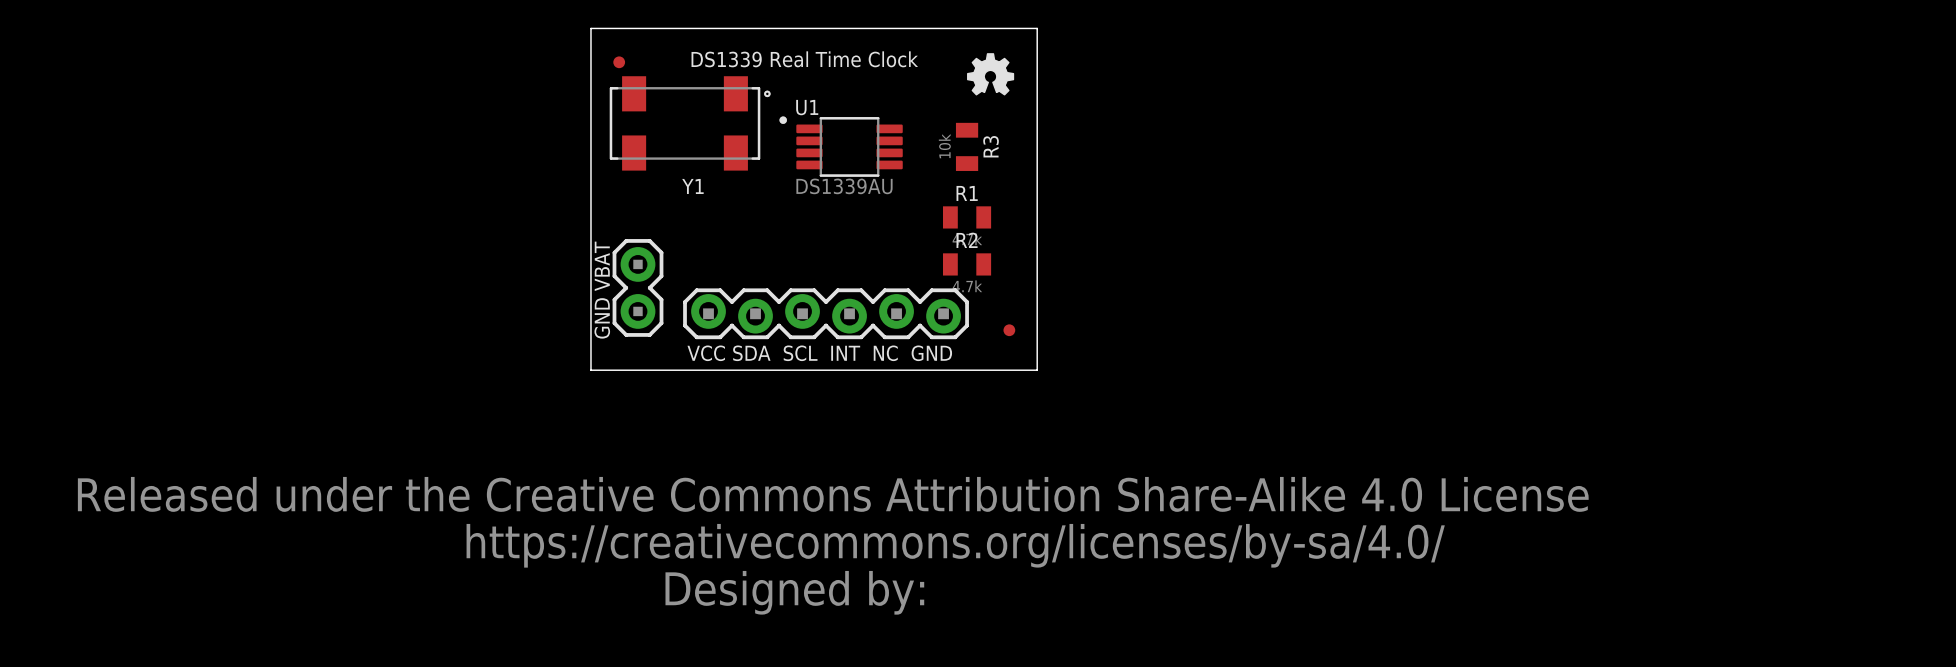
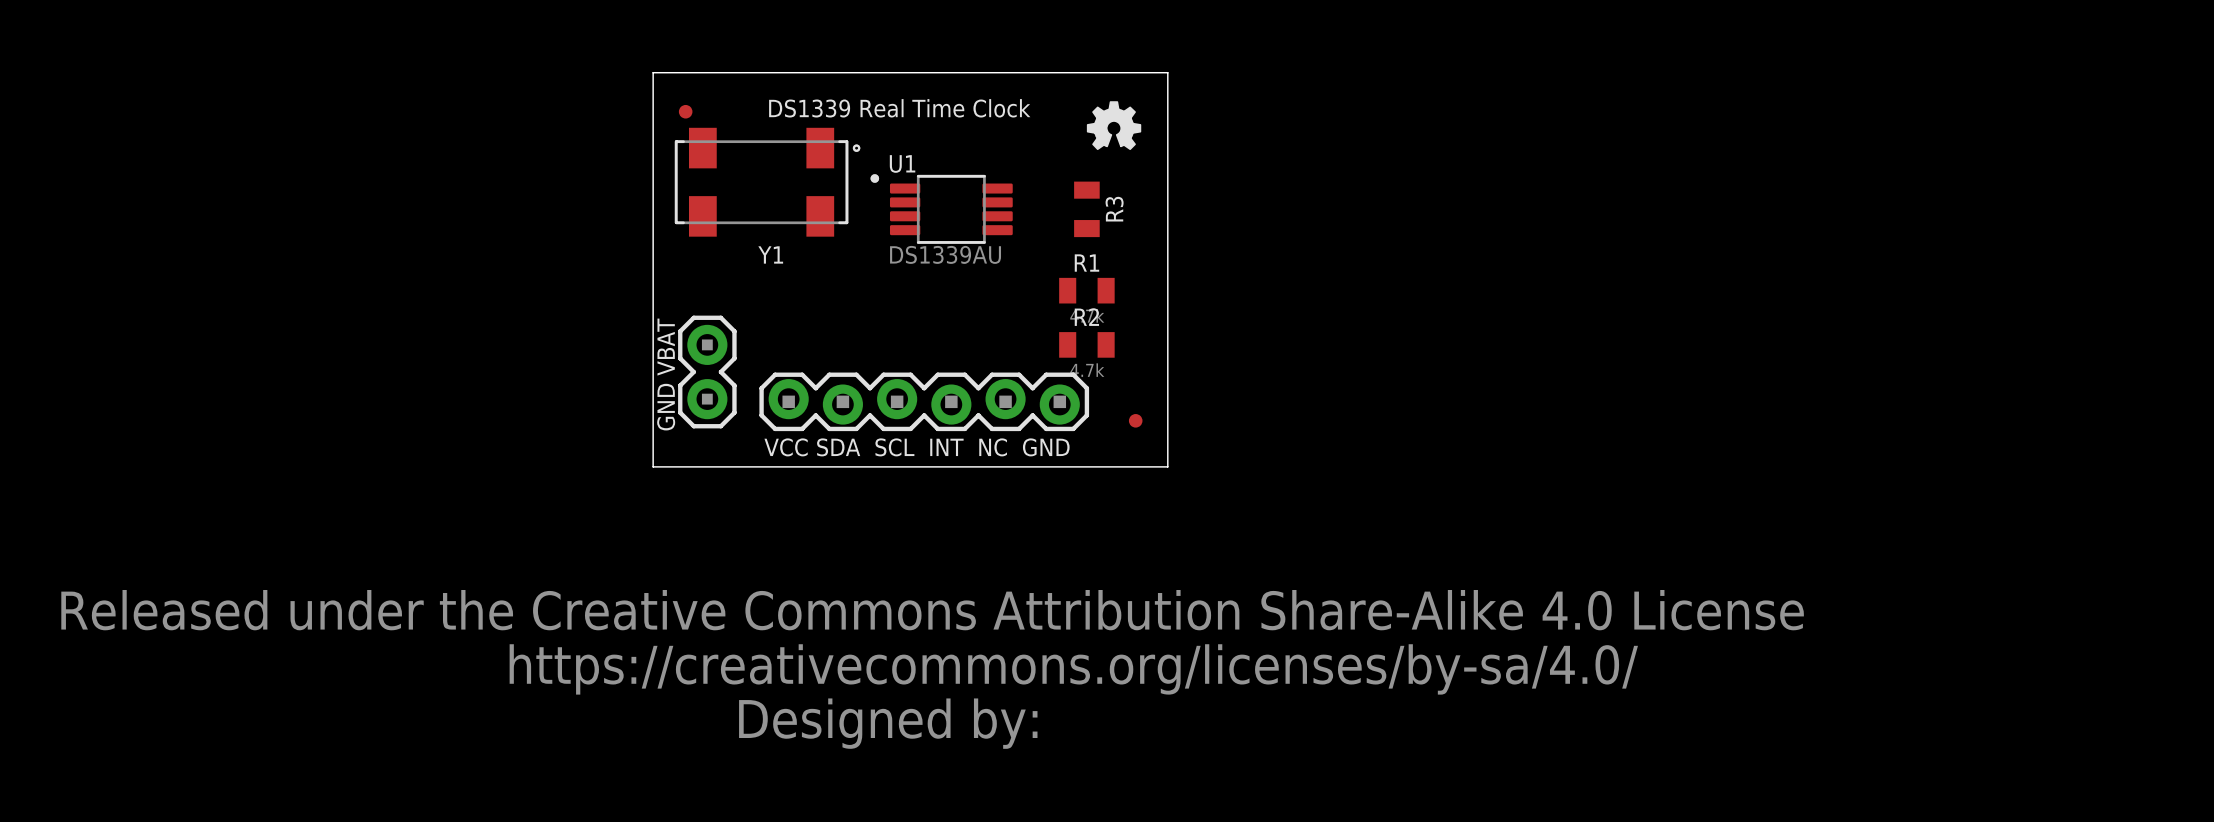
R3 value: 10k (944, 146) -> none

